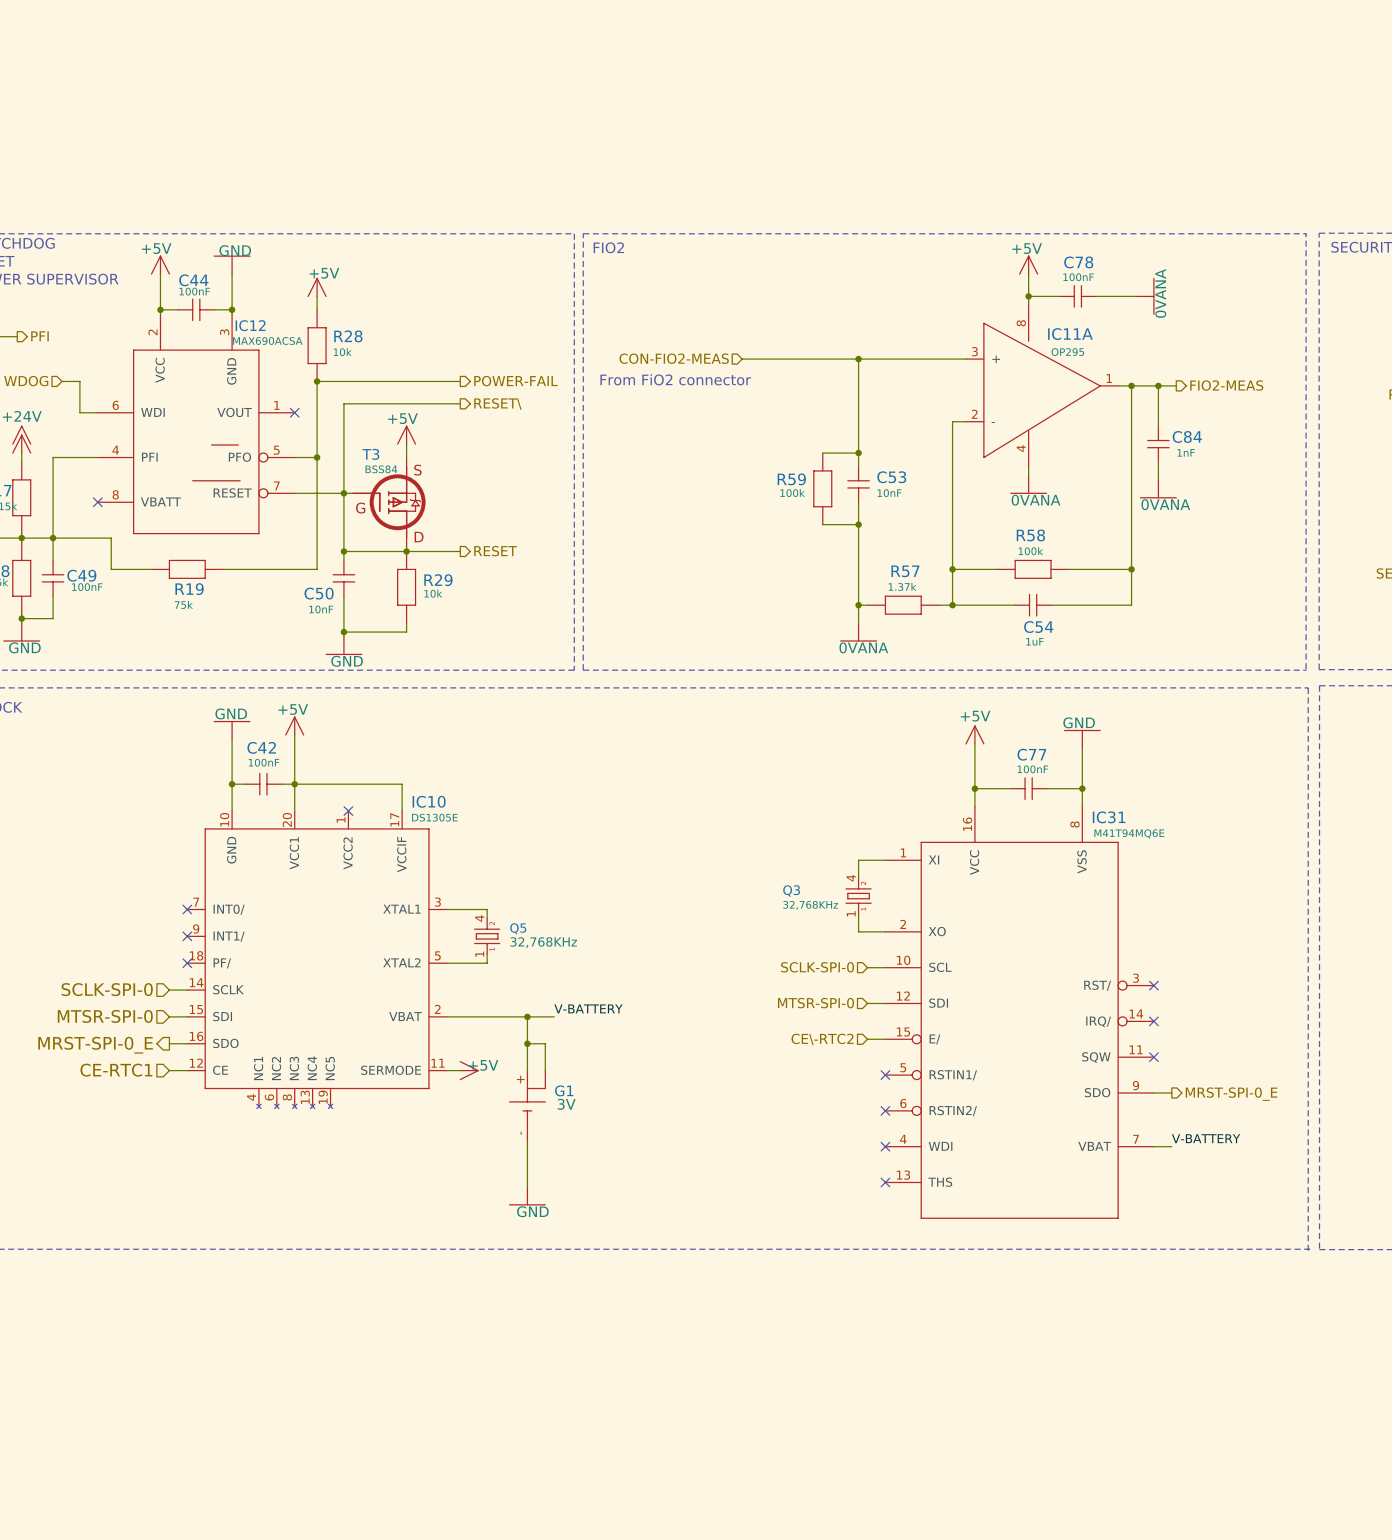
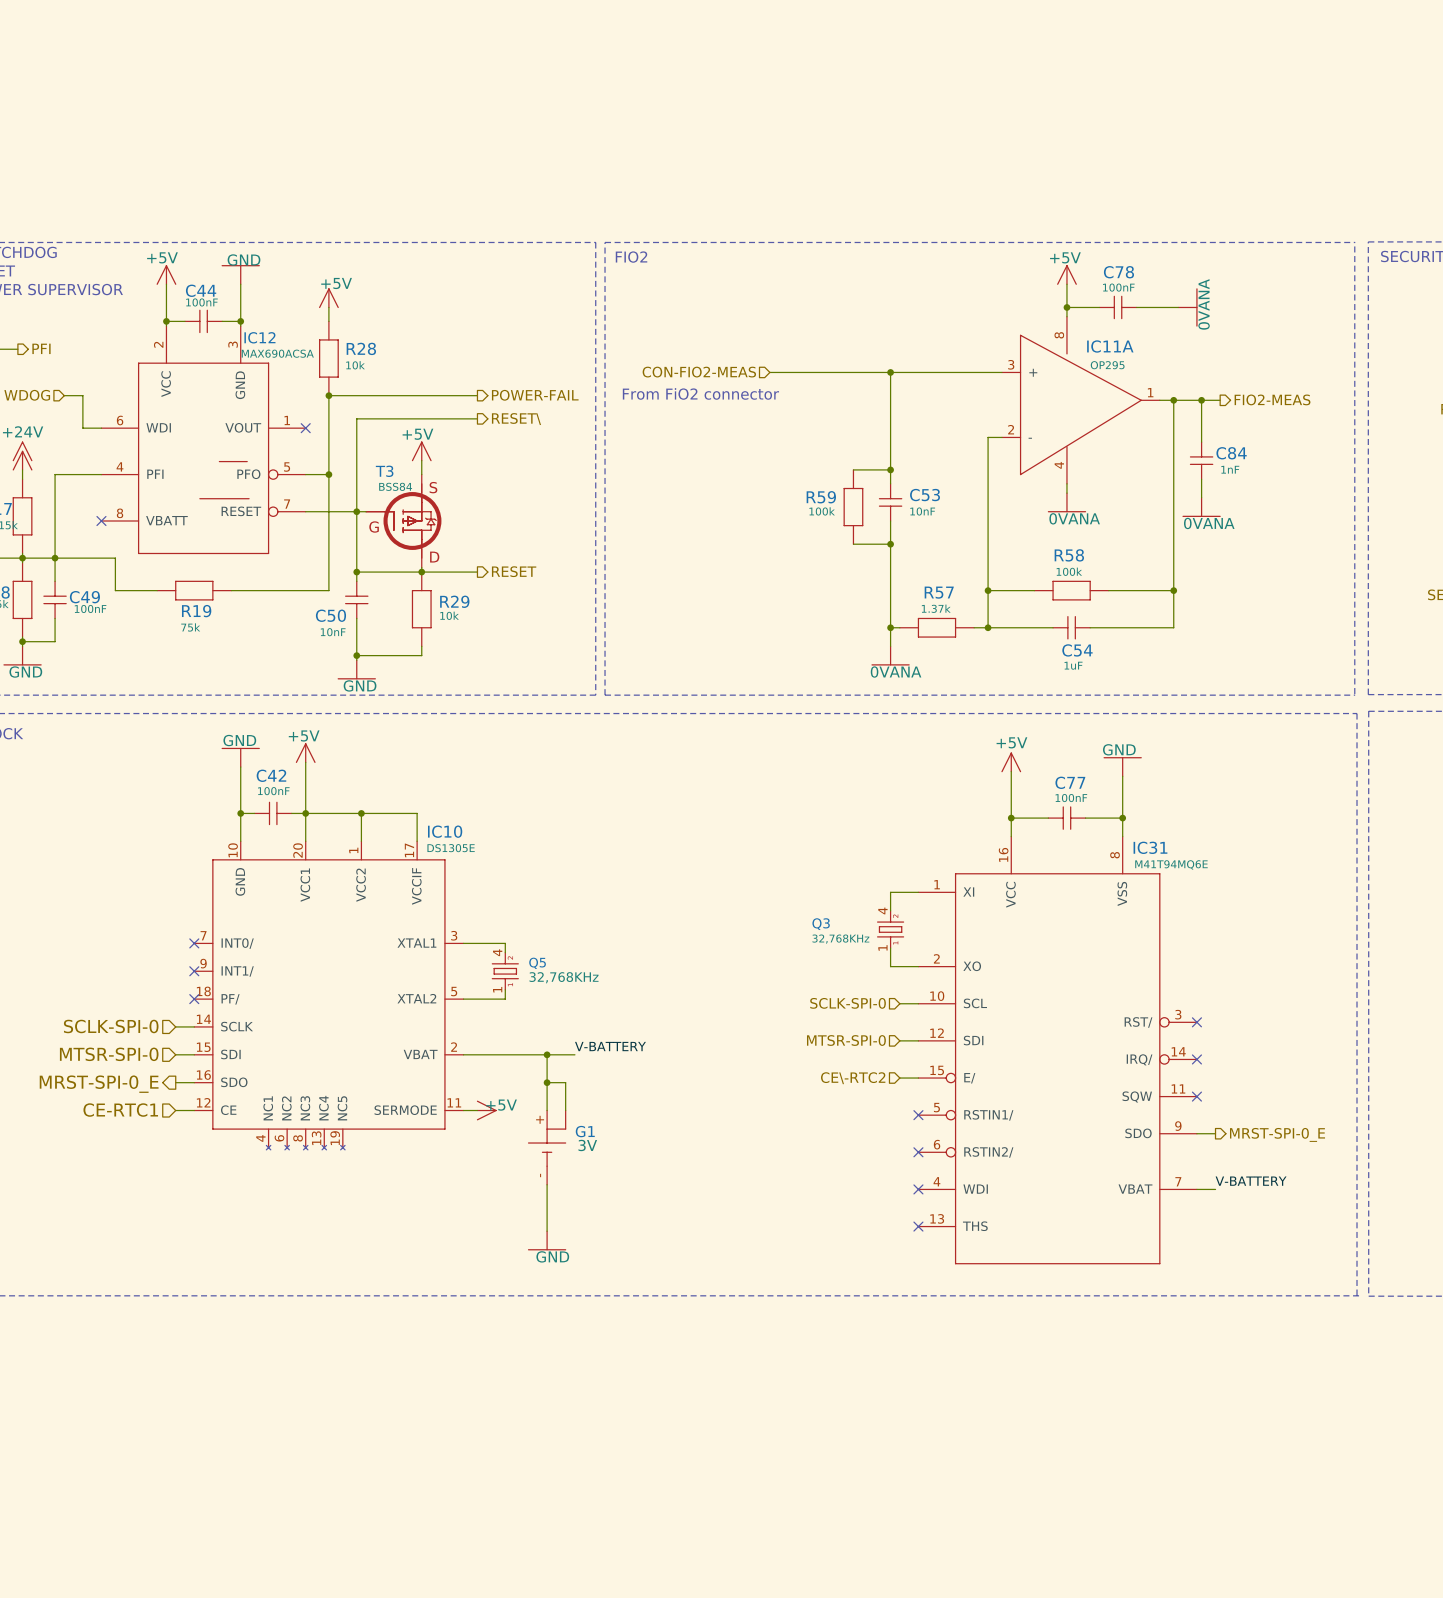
wire: none -> (361, 813) (361, 841)
junction: none -> (361, 813)
no-connect mark: (348, 811) -> none

